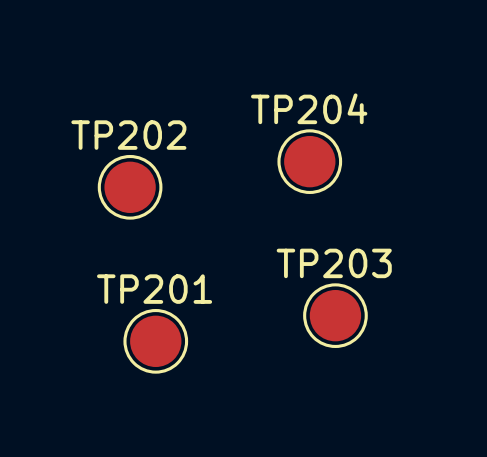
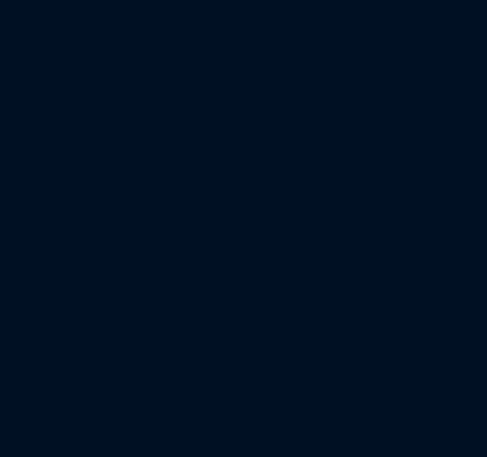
TP204: (309, 161) -> none
TP202: (130, 187) -> none
TP203: (335, 315) -> none
TP201: (155, 341) -> none

